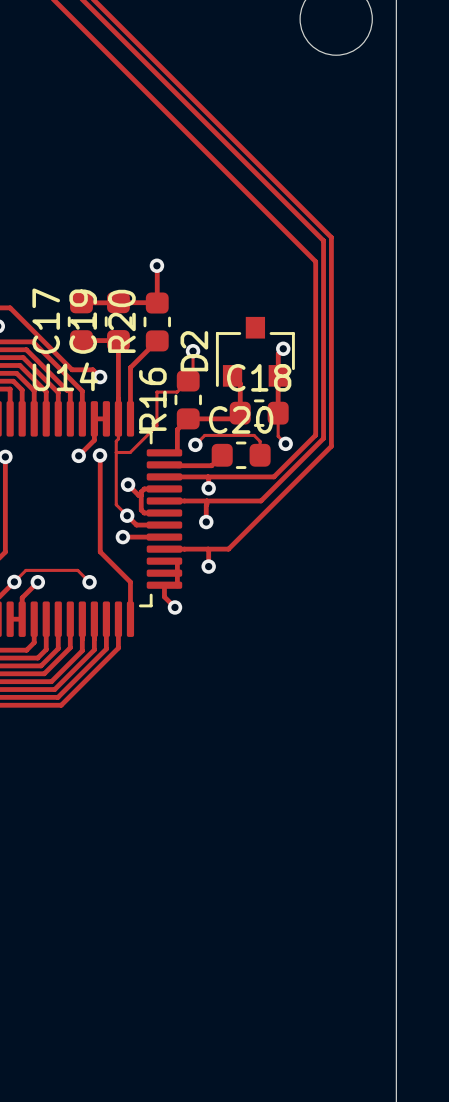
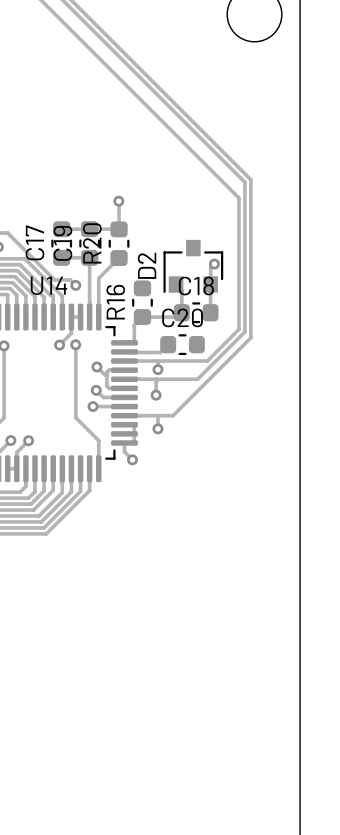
track: (193, 351) (193, 376) (177, 392) (156, 392) (156, 425) (130, 452) (116, 452) -> none
via: (193, 351) -> none
track: (278, 413) (278, 436) (285, 443) -> none
track: (118, 418) (118, 439) (116, 441) (116, 504) (127, 515) -> none
via: (285, 443) -> none
track: (195, 444) (204, 435) (254, 435) (260, 441) (260, 455) -> none
via: (195, 444) -> none
track: (14, 581) (25, 570) (77, 570) (89, 582) -> none
via: (89, 582) -> none

